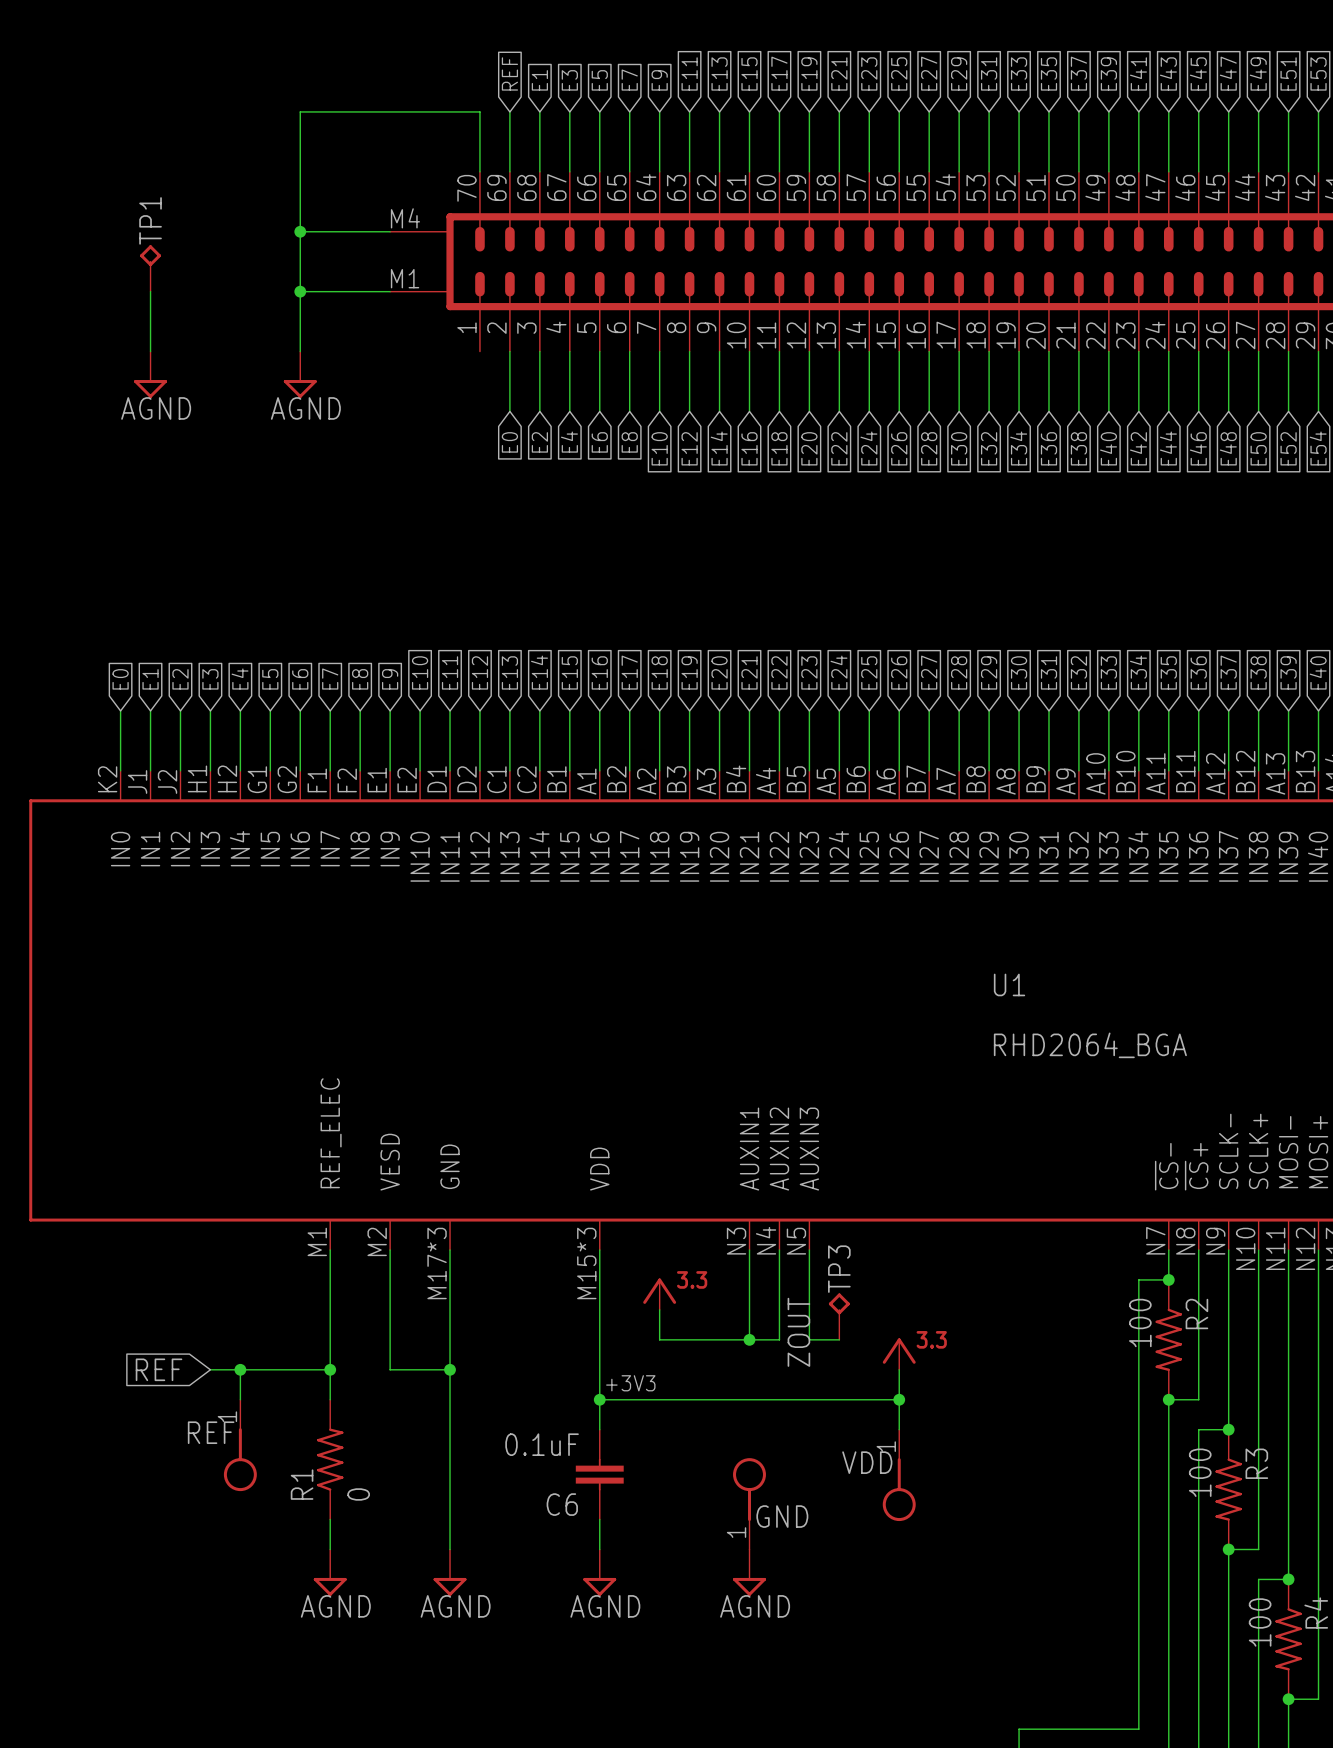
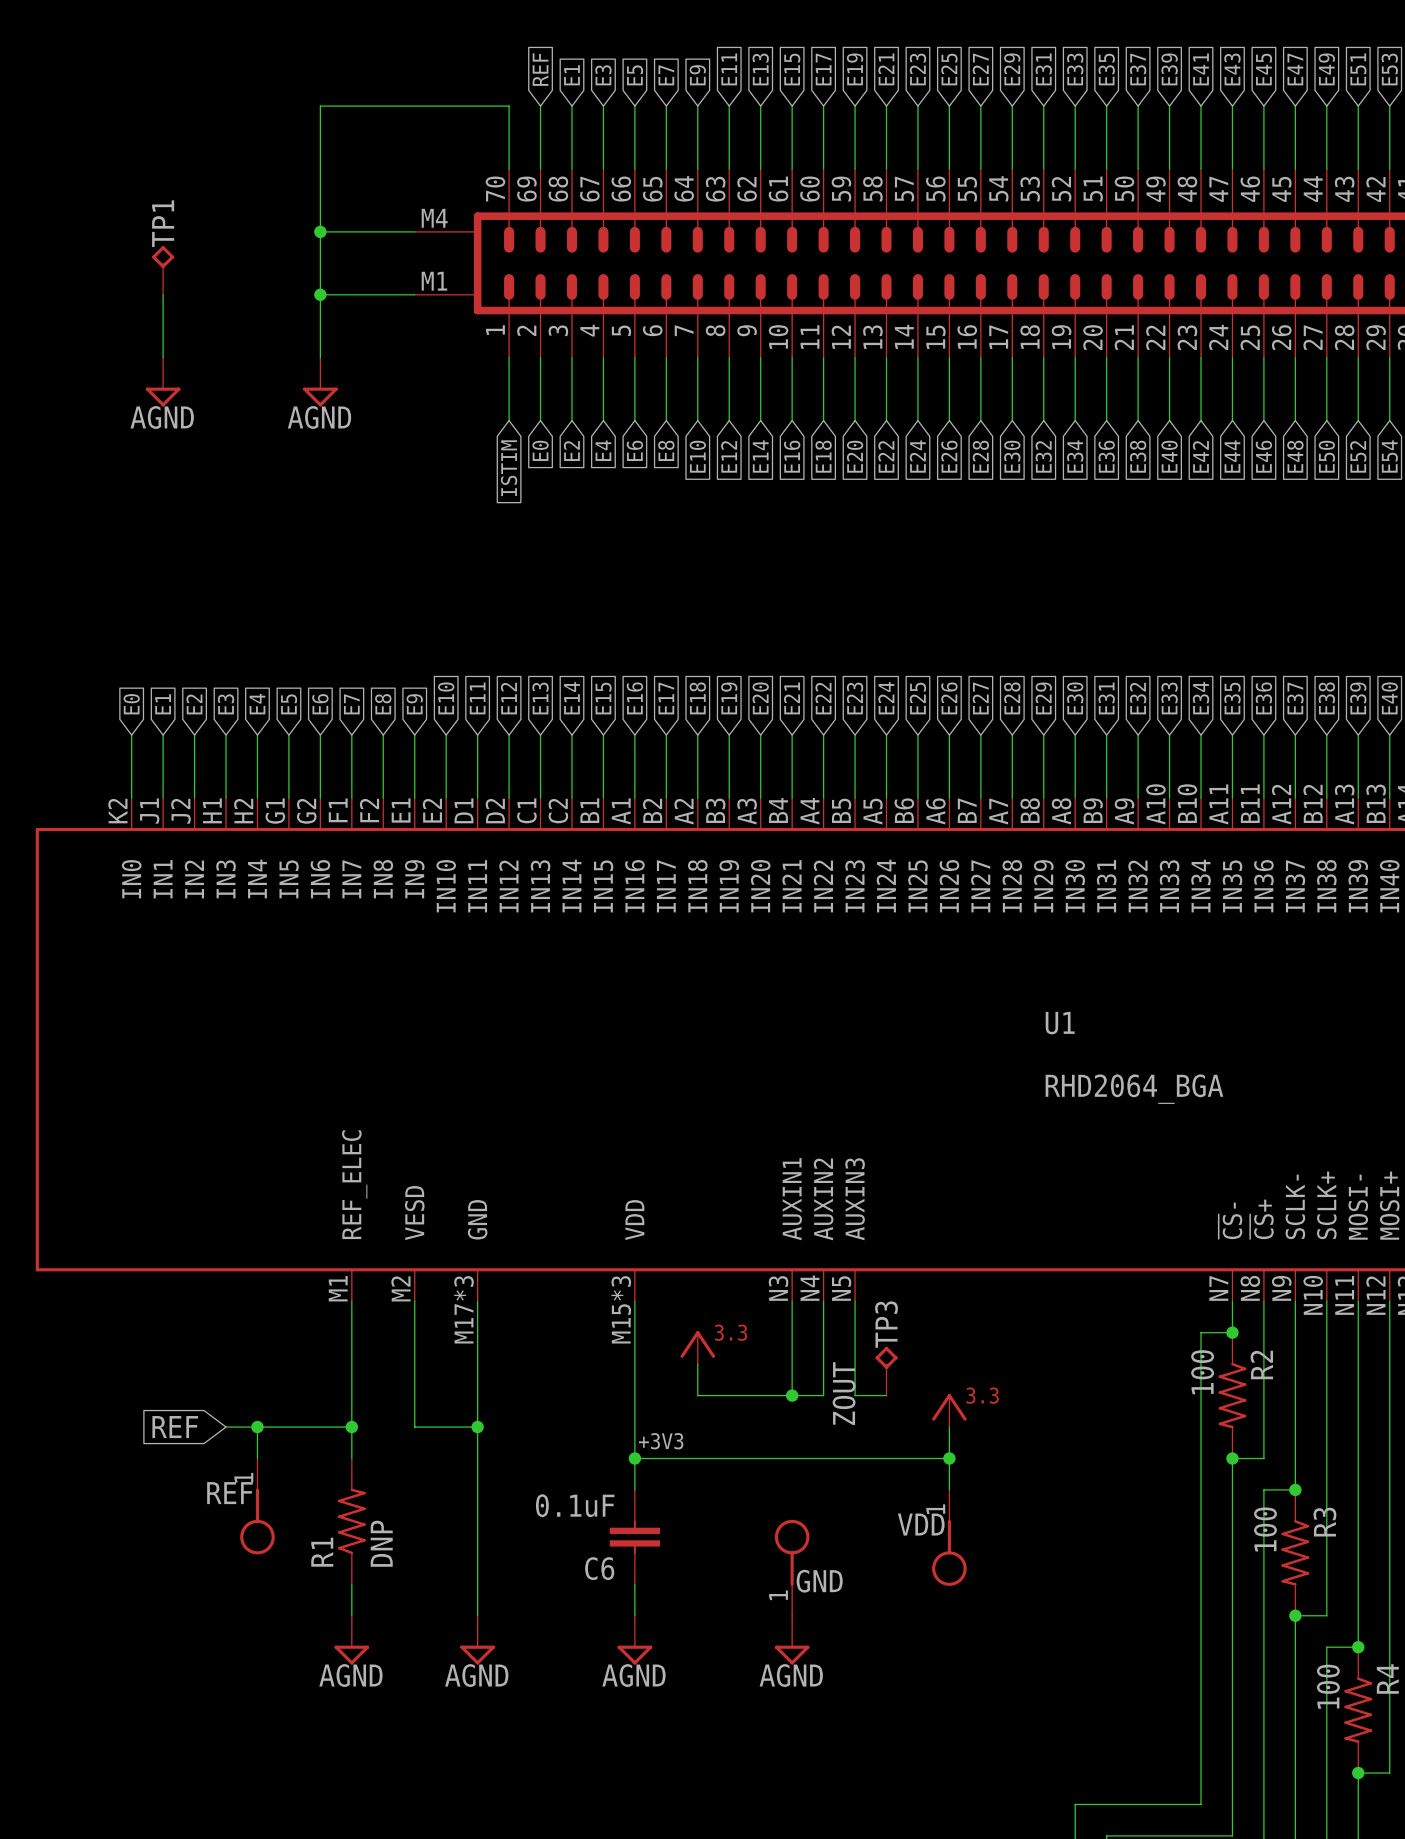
wire: none -> (509, 357) (509, 420)
global label: none -> ISTIM (509, 468)
R1 value: 0 (358, 1494) -> DNP (381, 1543)

